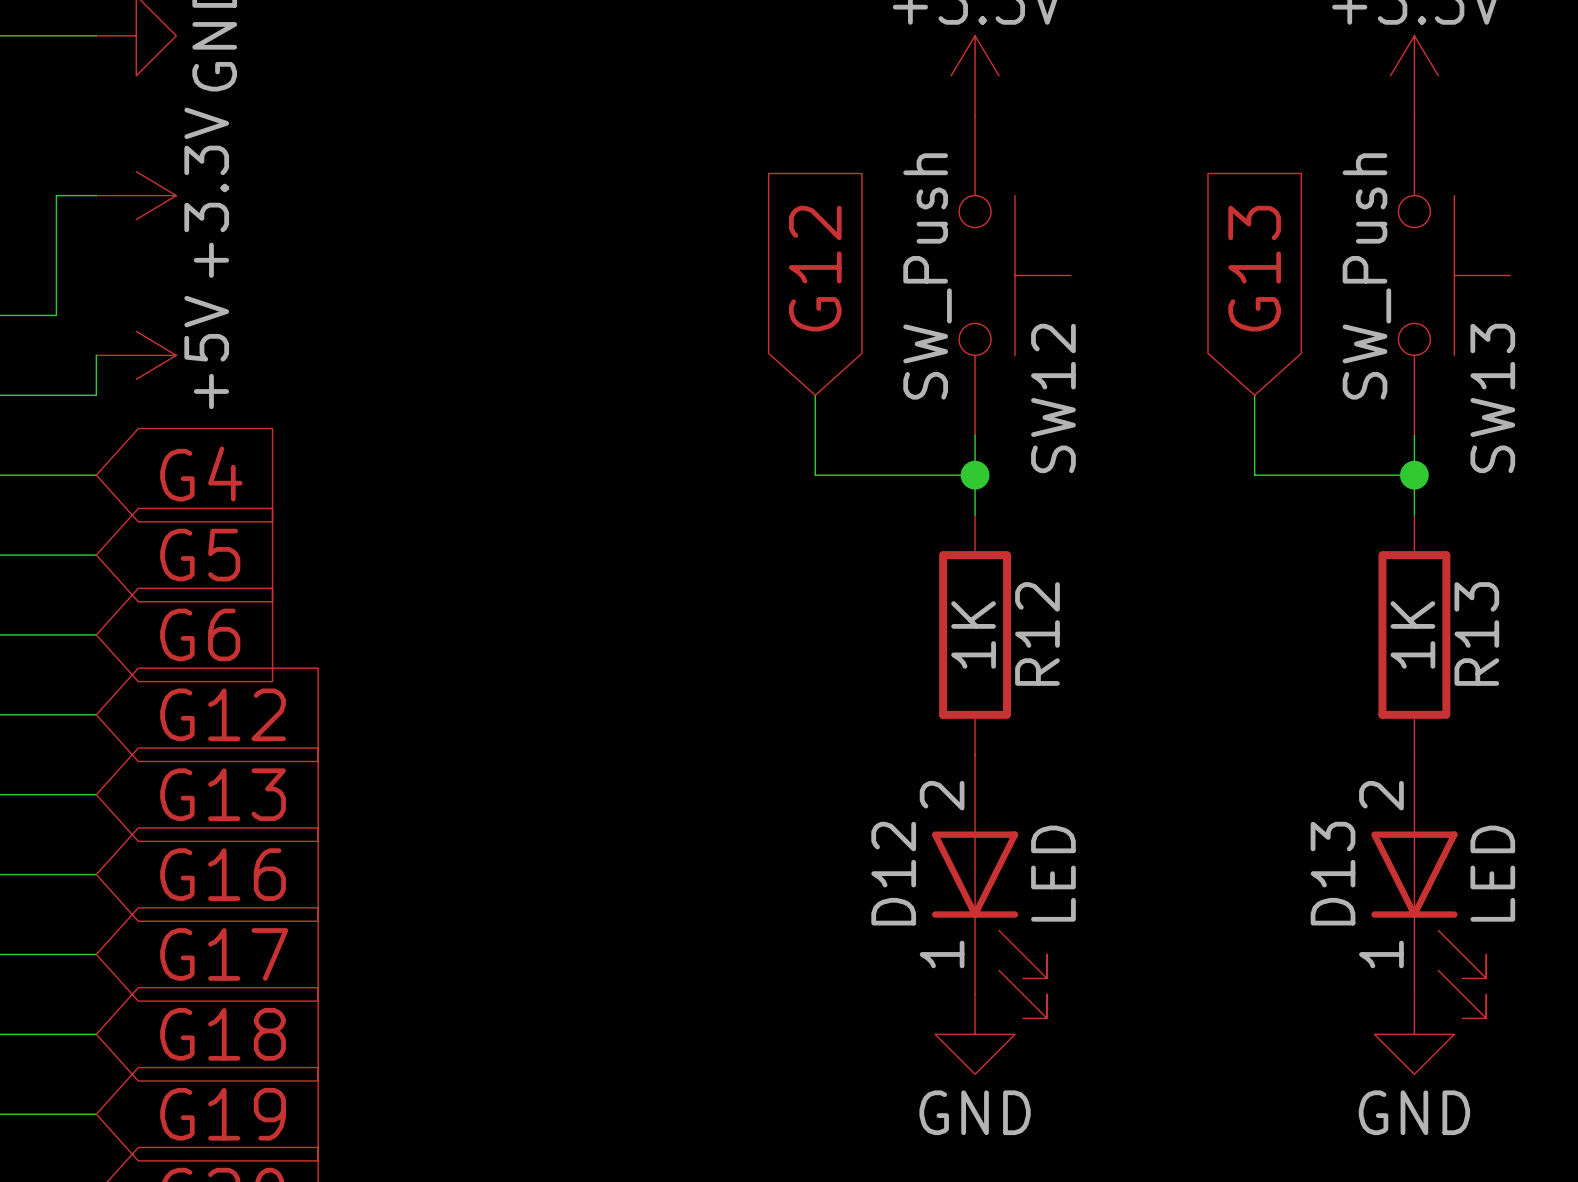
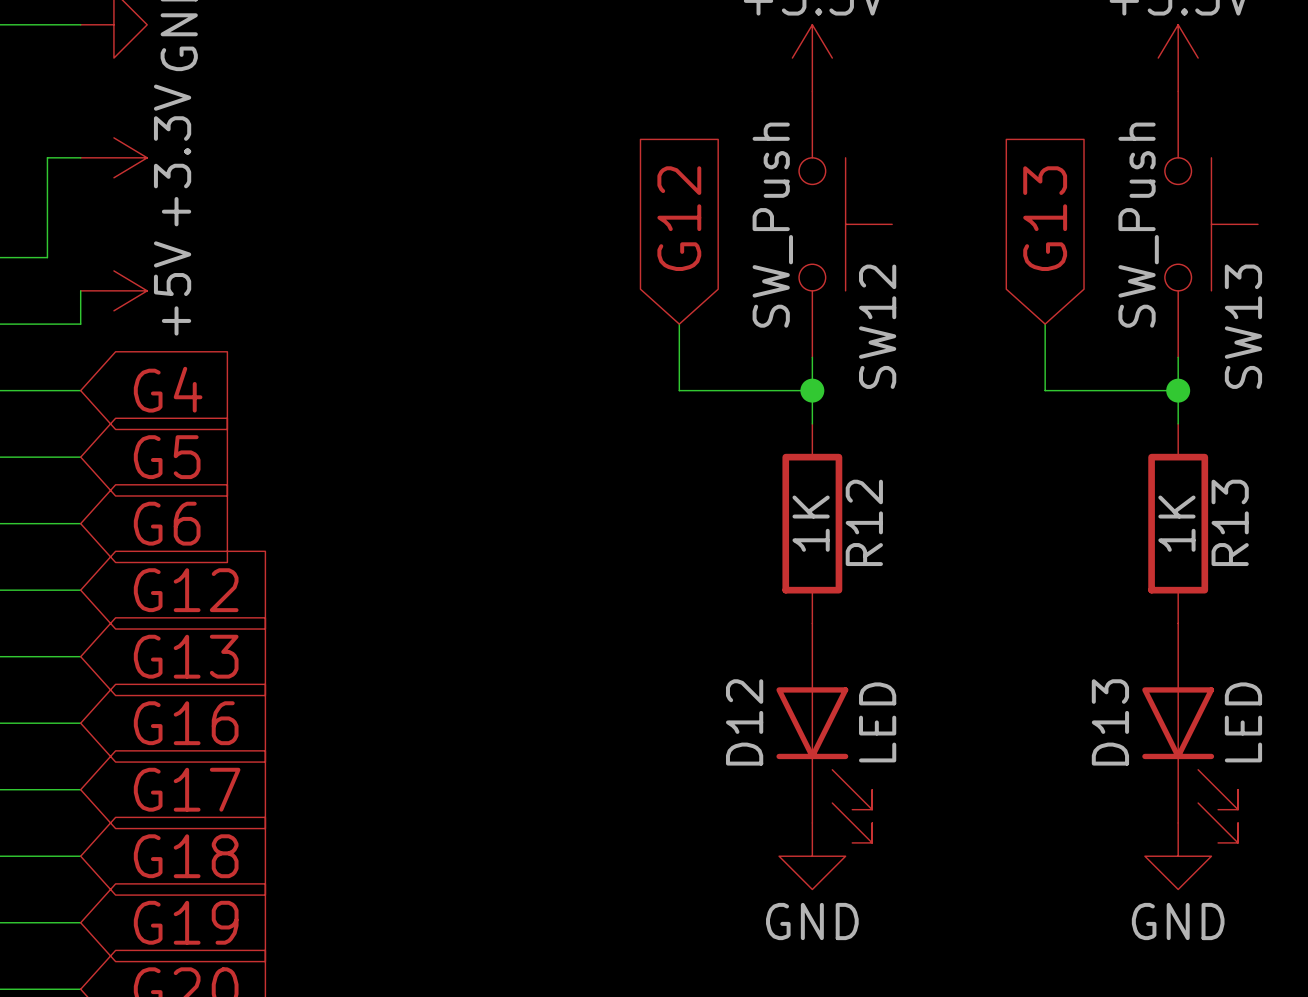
D12 pin number: 2 (942, 795) -> none
D13 pin number: 2 (1381, 795) -> none
D12 pin number: 1 (942, 954) -> none
D13 pin number: 1 (1381, 954) -> none

